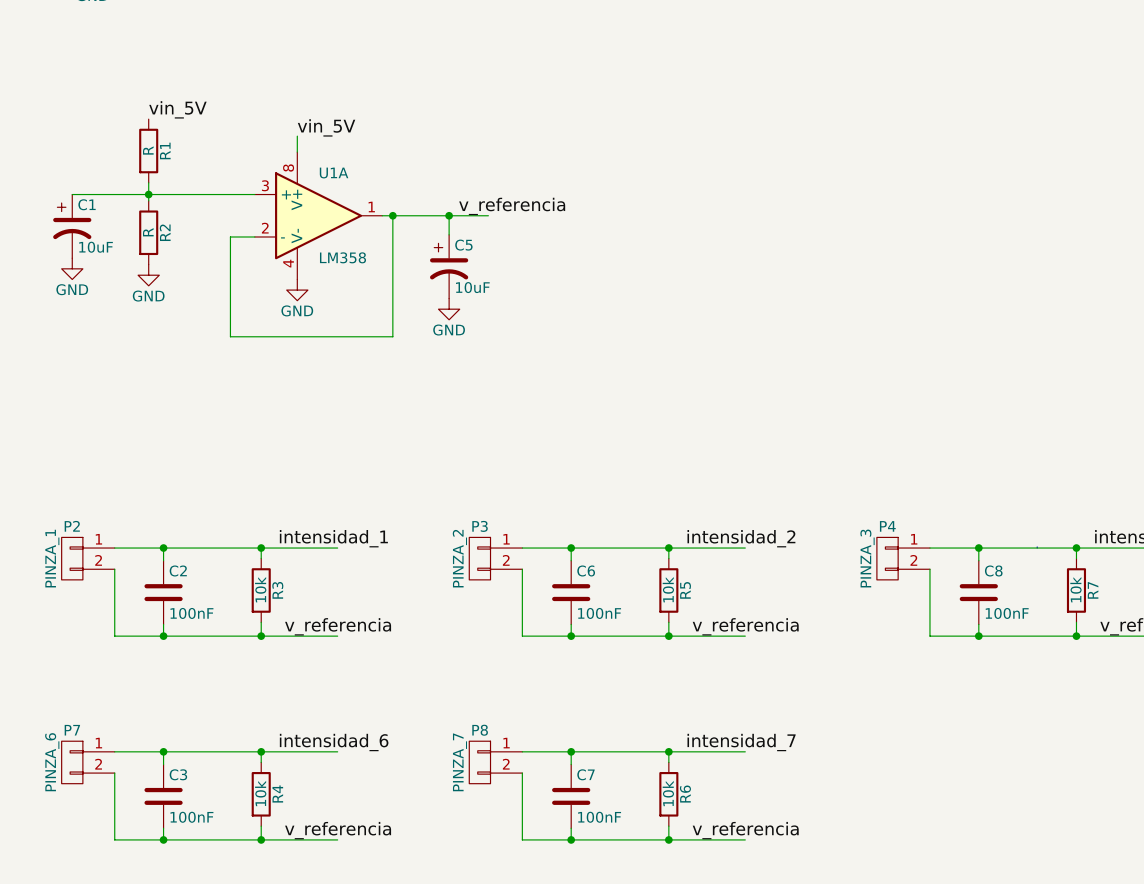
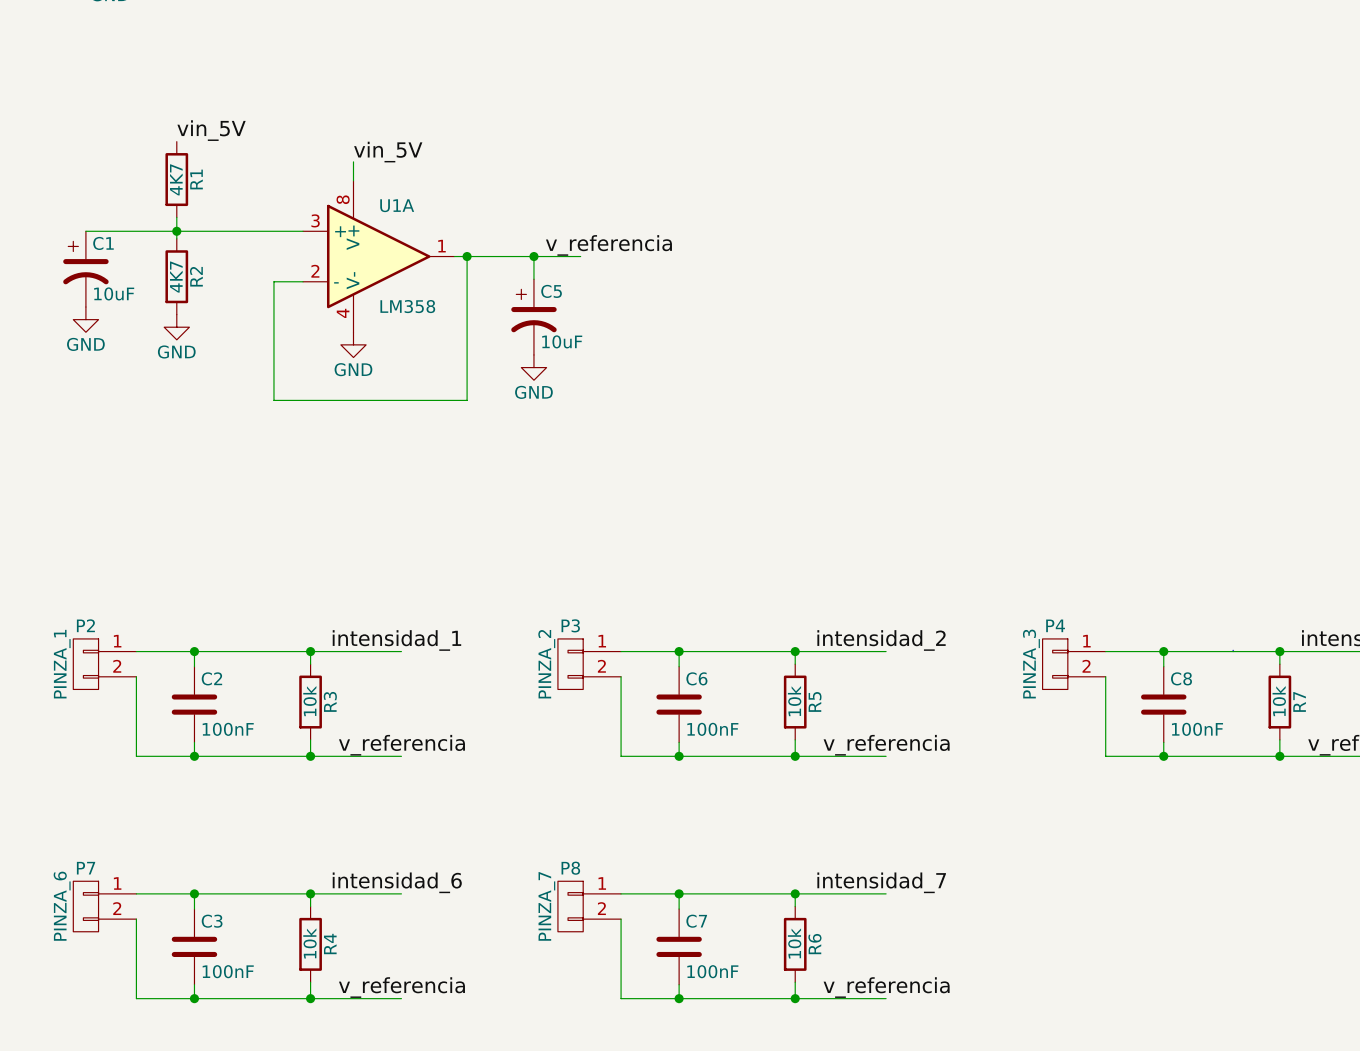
R1 value: R (148, 150) -> 4K7 (176, 179)
R2 value: R (148, 232) -> 4K7 (176, 277)

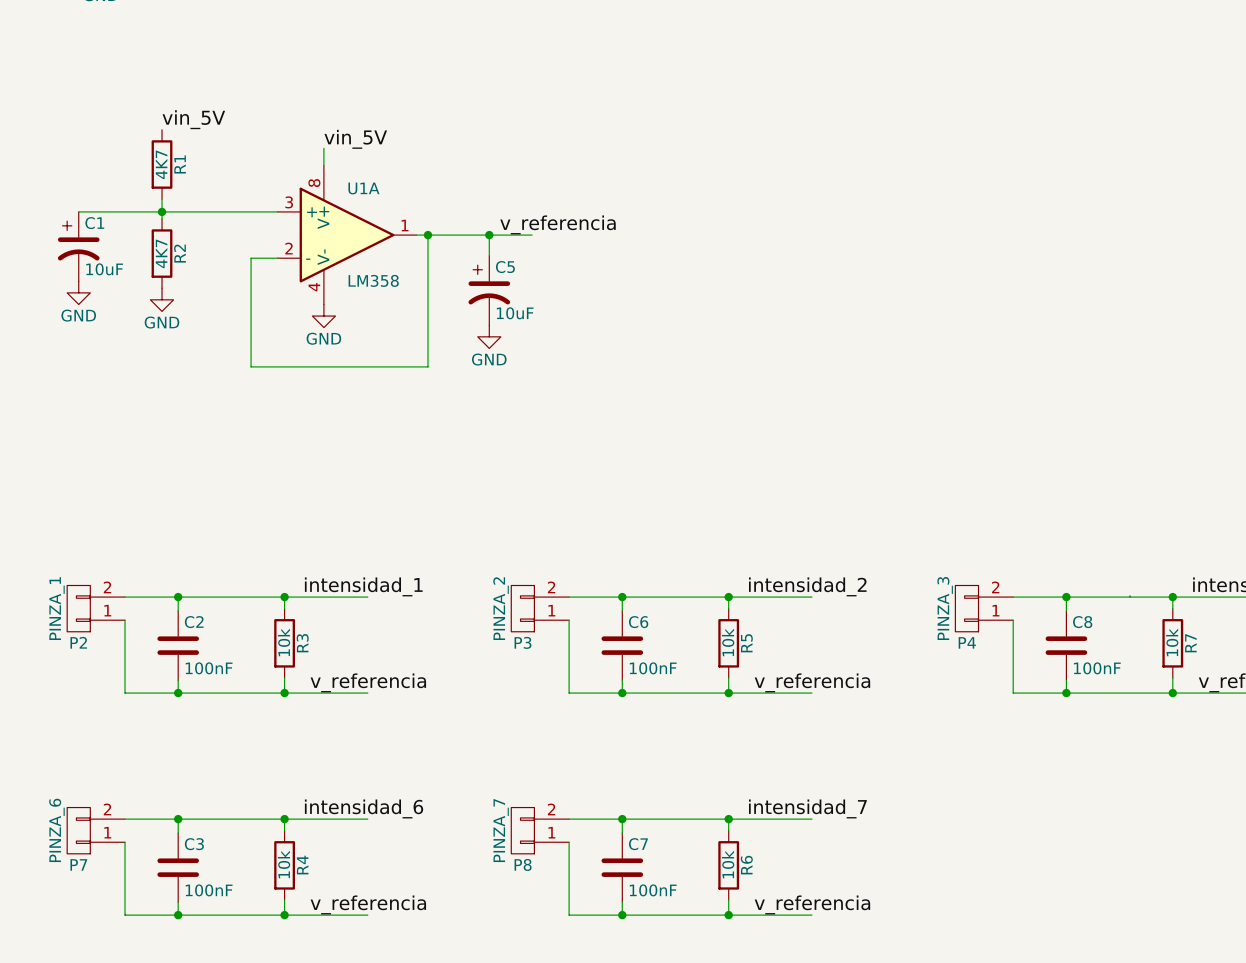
P2 flip: as is (85, 664) -> up-down (78, 608)
P3 flip: as is (570, 664) -> up-down (522, 608)
P4 flip: as is (1055, 664) -> up-down (966, 608)
P7 flip: as is (85, 906) -> up-down (78, 830)
P8 flip: as is (570, 906) -> up-down (522, 830)

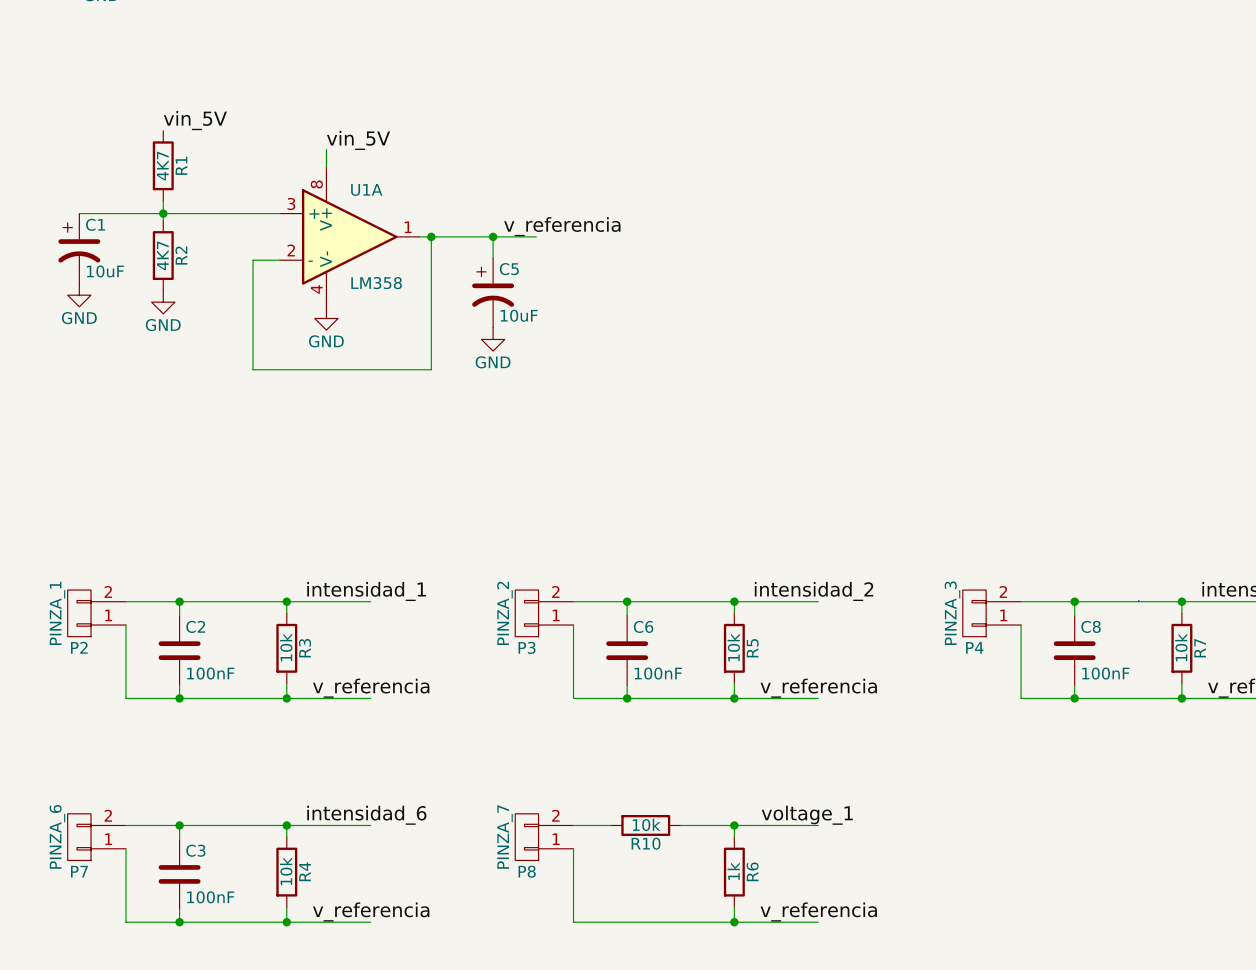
label: intensidad_7 (807, 808) -> voltage_1 (807, 815)
wire: (606, 819) (675, 819) -> none
wire: (622, 819) (622, 832) -> none
junction: (622, 819) -> none
R10: none -> 10k (645, 825)
R6 value: 10k (728, 864) -> 1k (733, 871)
C7: 100nF (622, 867) -> none
wire: (622, 902) (622, 915) -> none
junction: (622, 915) -> none

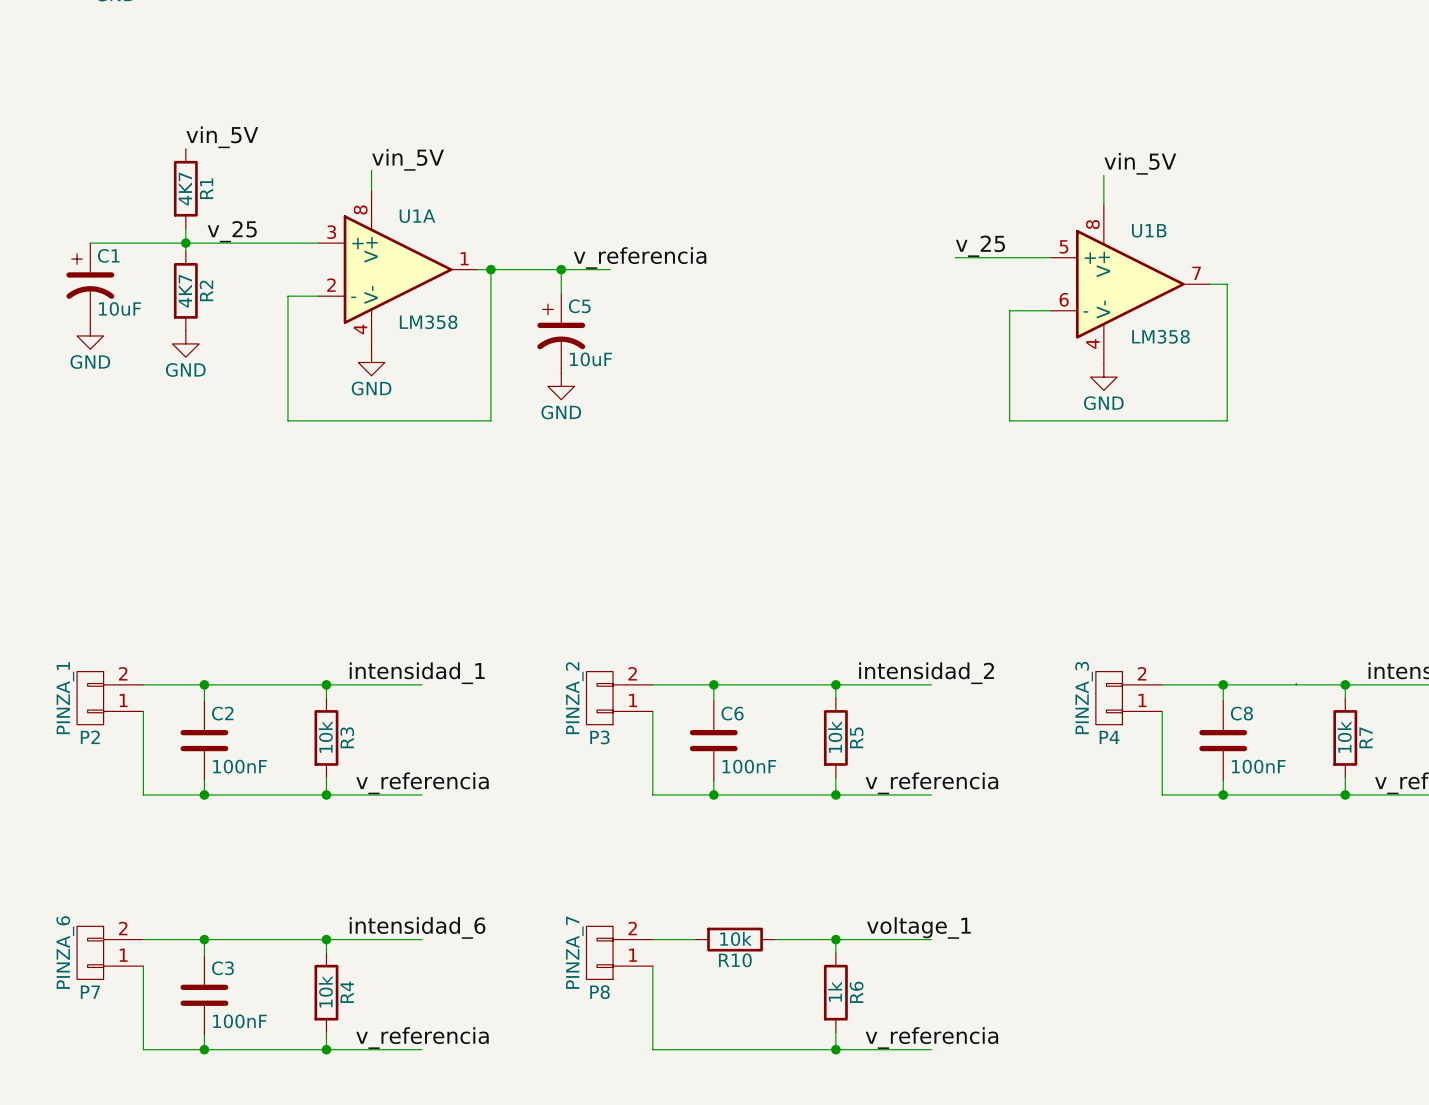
label: none -> vin_5V (1140, 163)
wire: none -> (1103, 175) (1103, 204)
label: none -> v_25 (232, 231)
label: none -> v_25 (980, 246)
wire: none -> (955, 257) (1050, 257)
U1B: none -> LM358 (1130, 284)
wire: none -> (1209, 284) (1227, 284) (1227, 420) (1009, 420) (1009, 310) (1050, 310)
power symbol: none -> GND (1103, 377)

